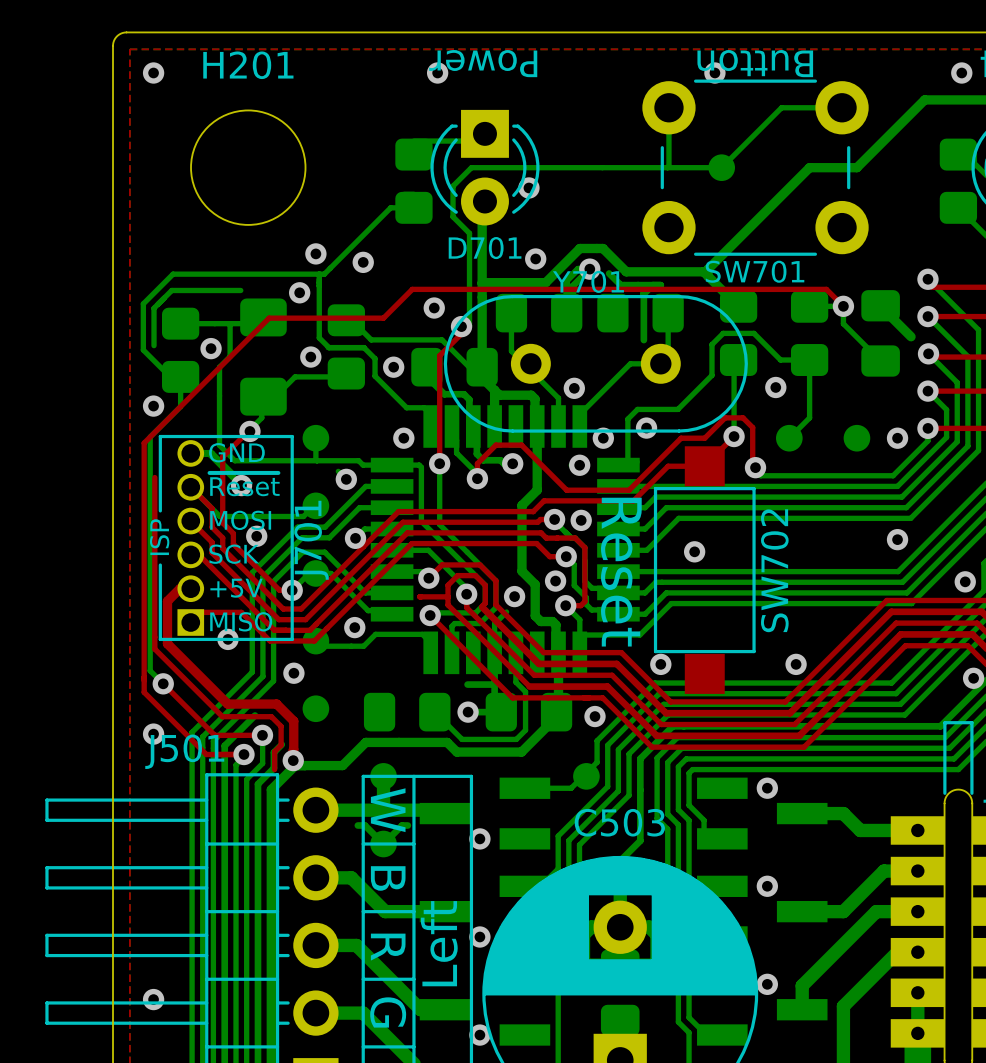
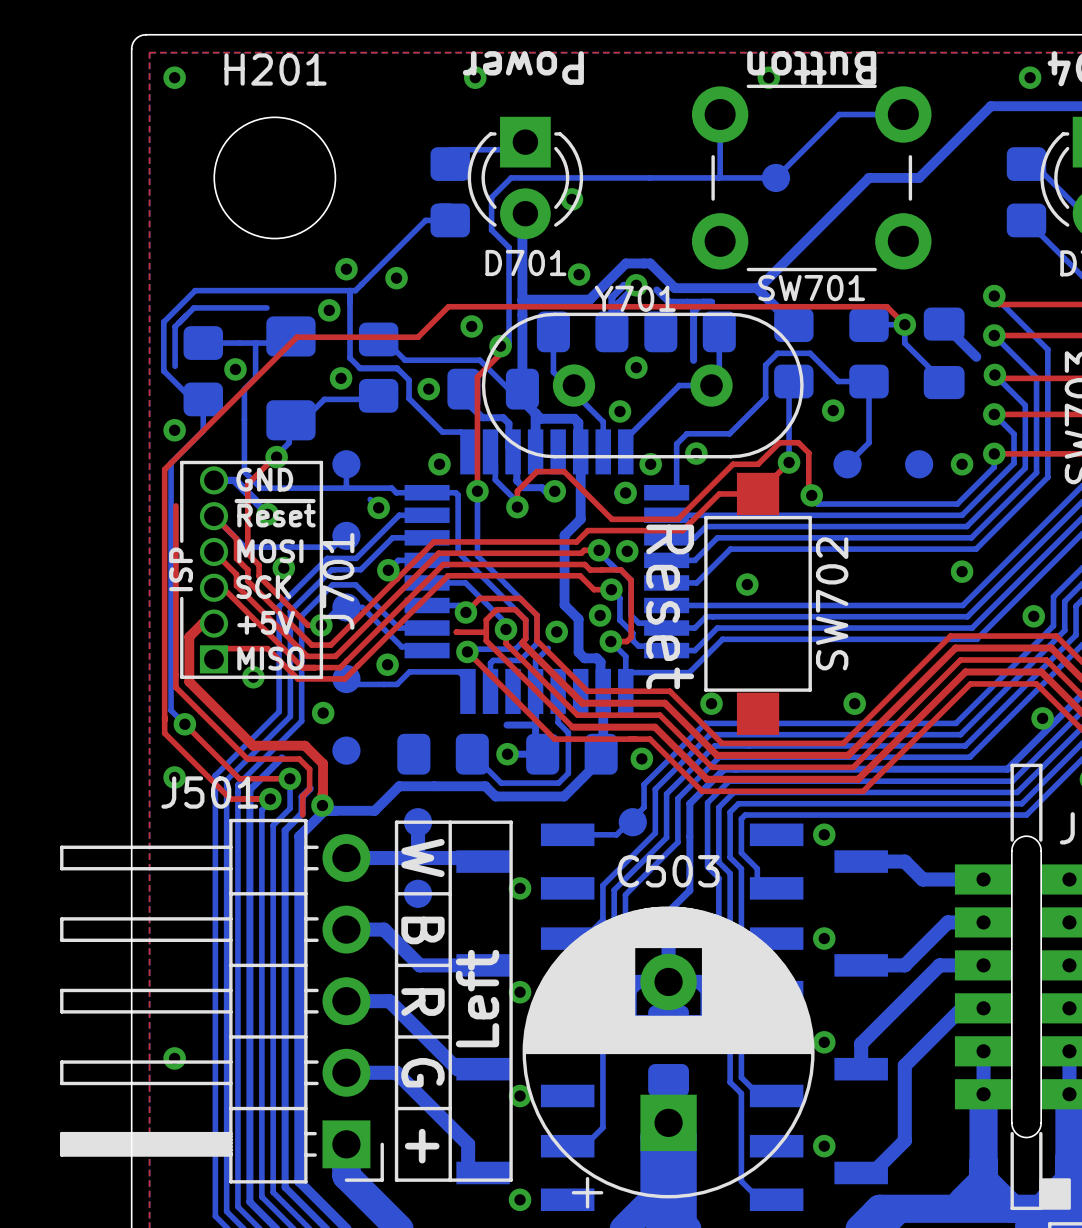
via: none -> (636, 367)
bottom track: (357, 825) (365, 825) (383, 844) (402, 825) (407, 825) -> none

